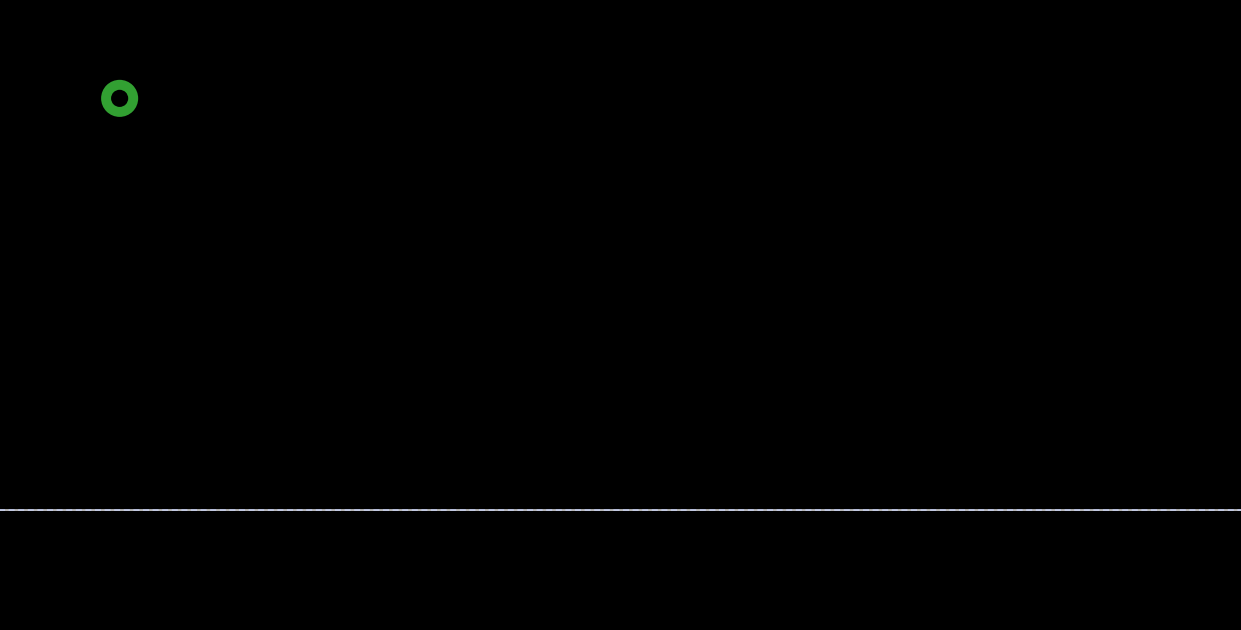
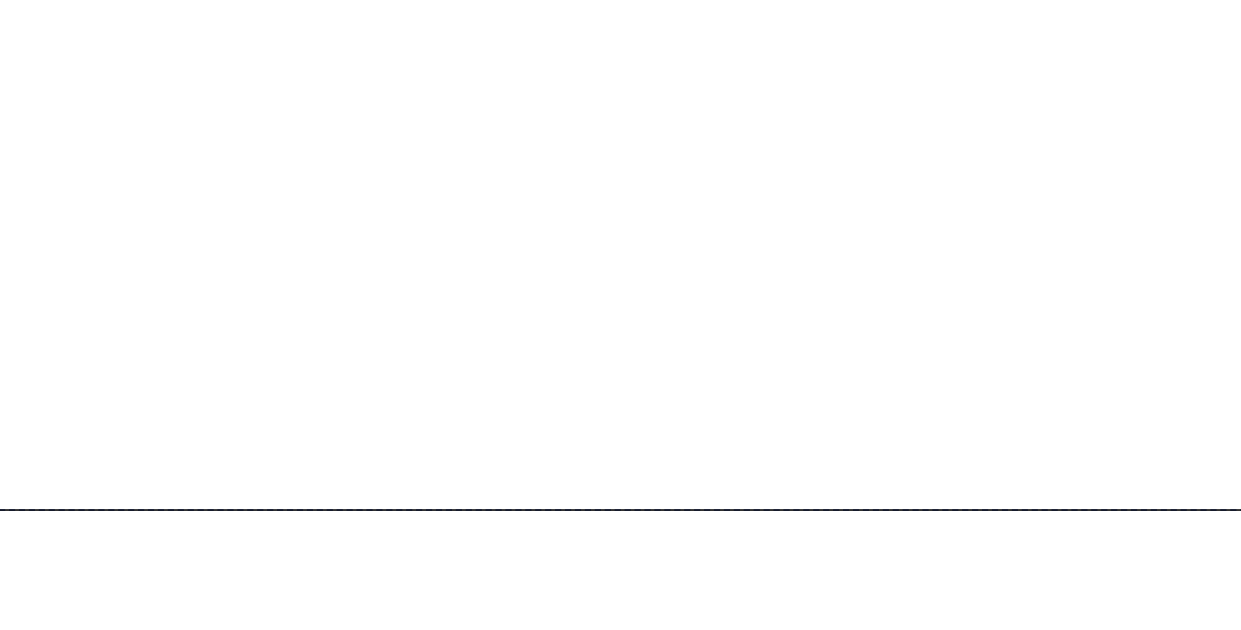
via: (119, 98) -> none

